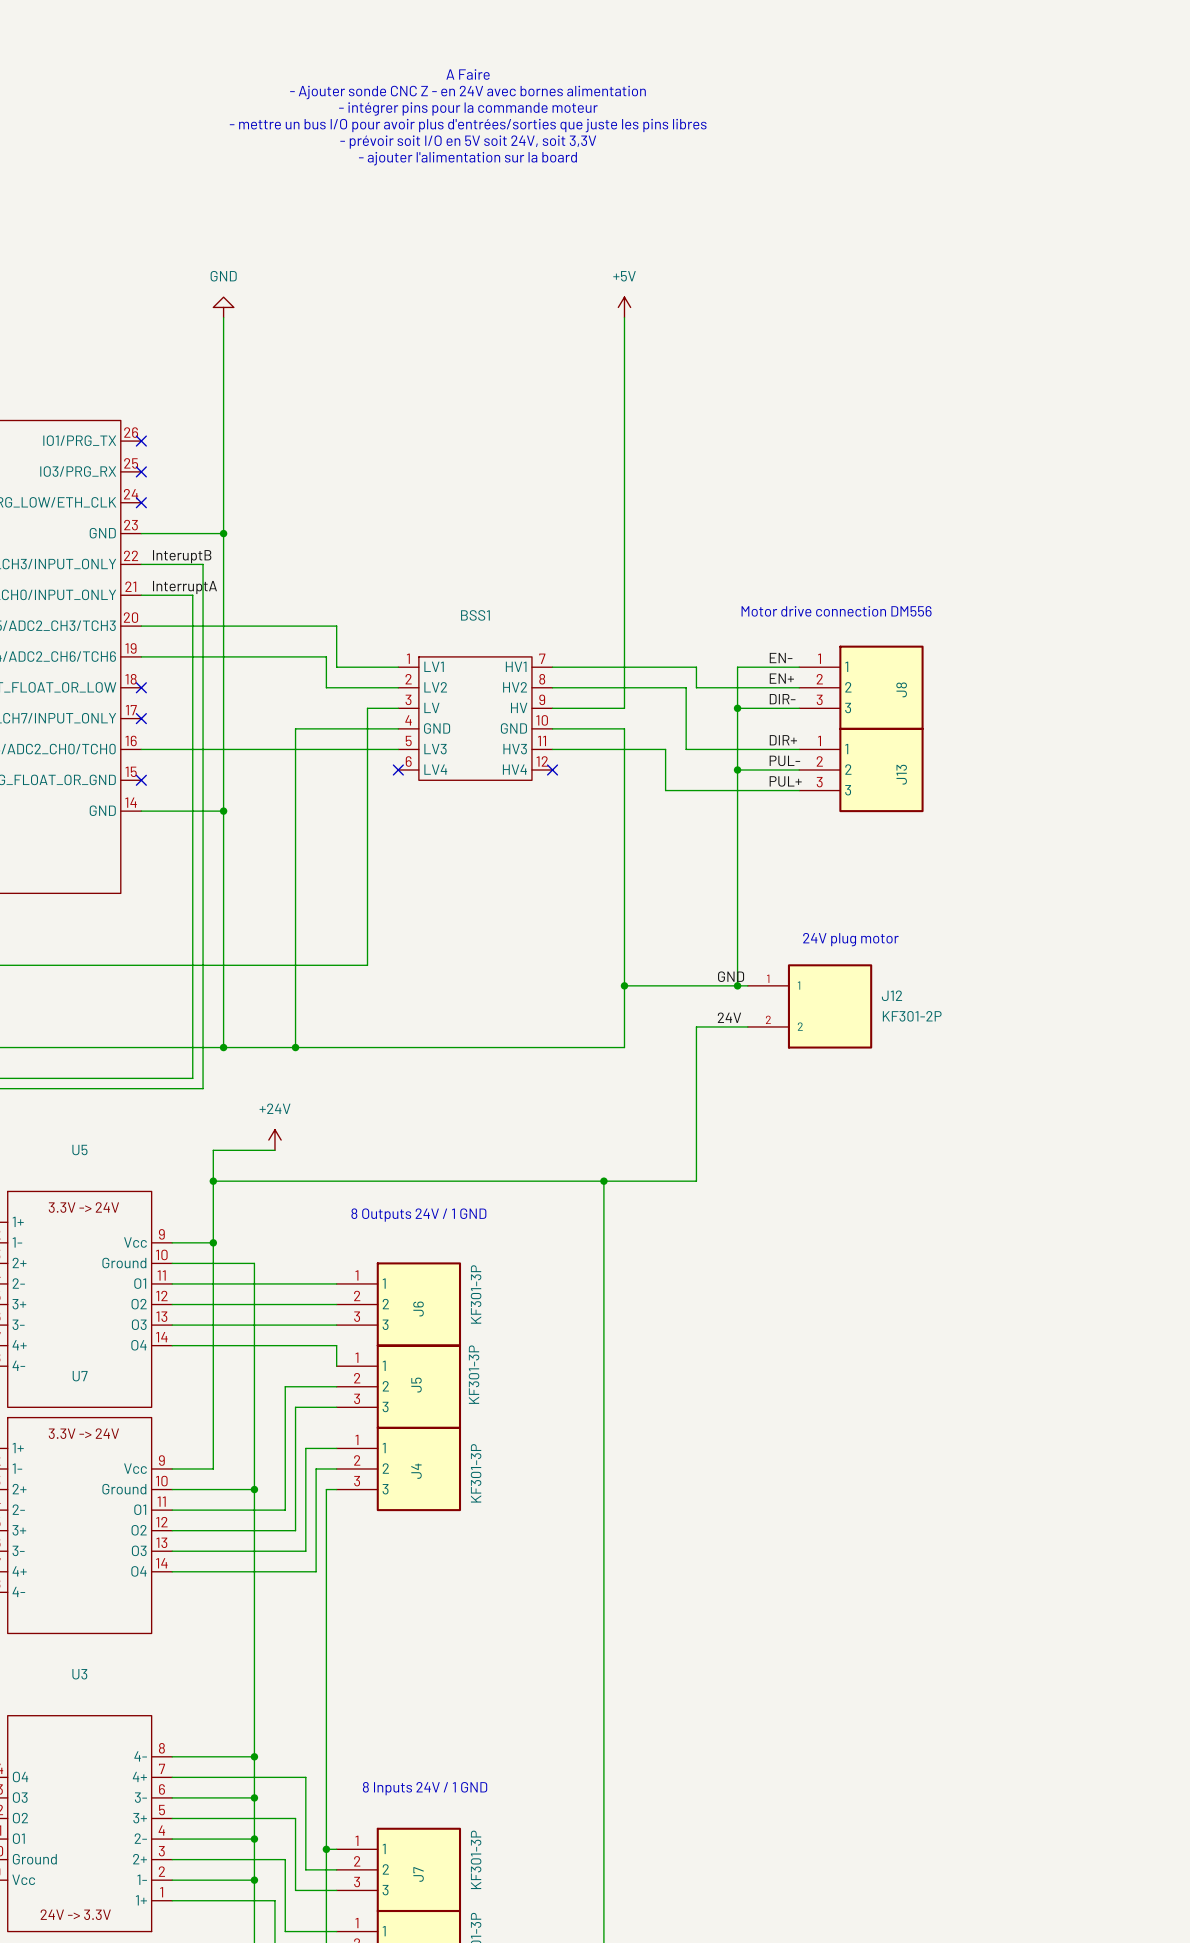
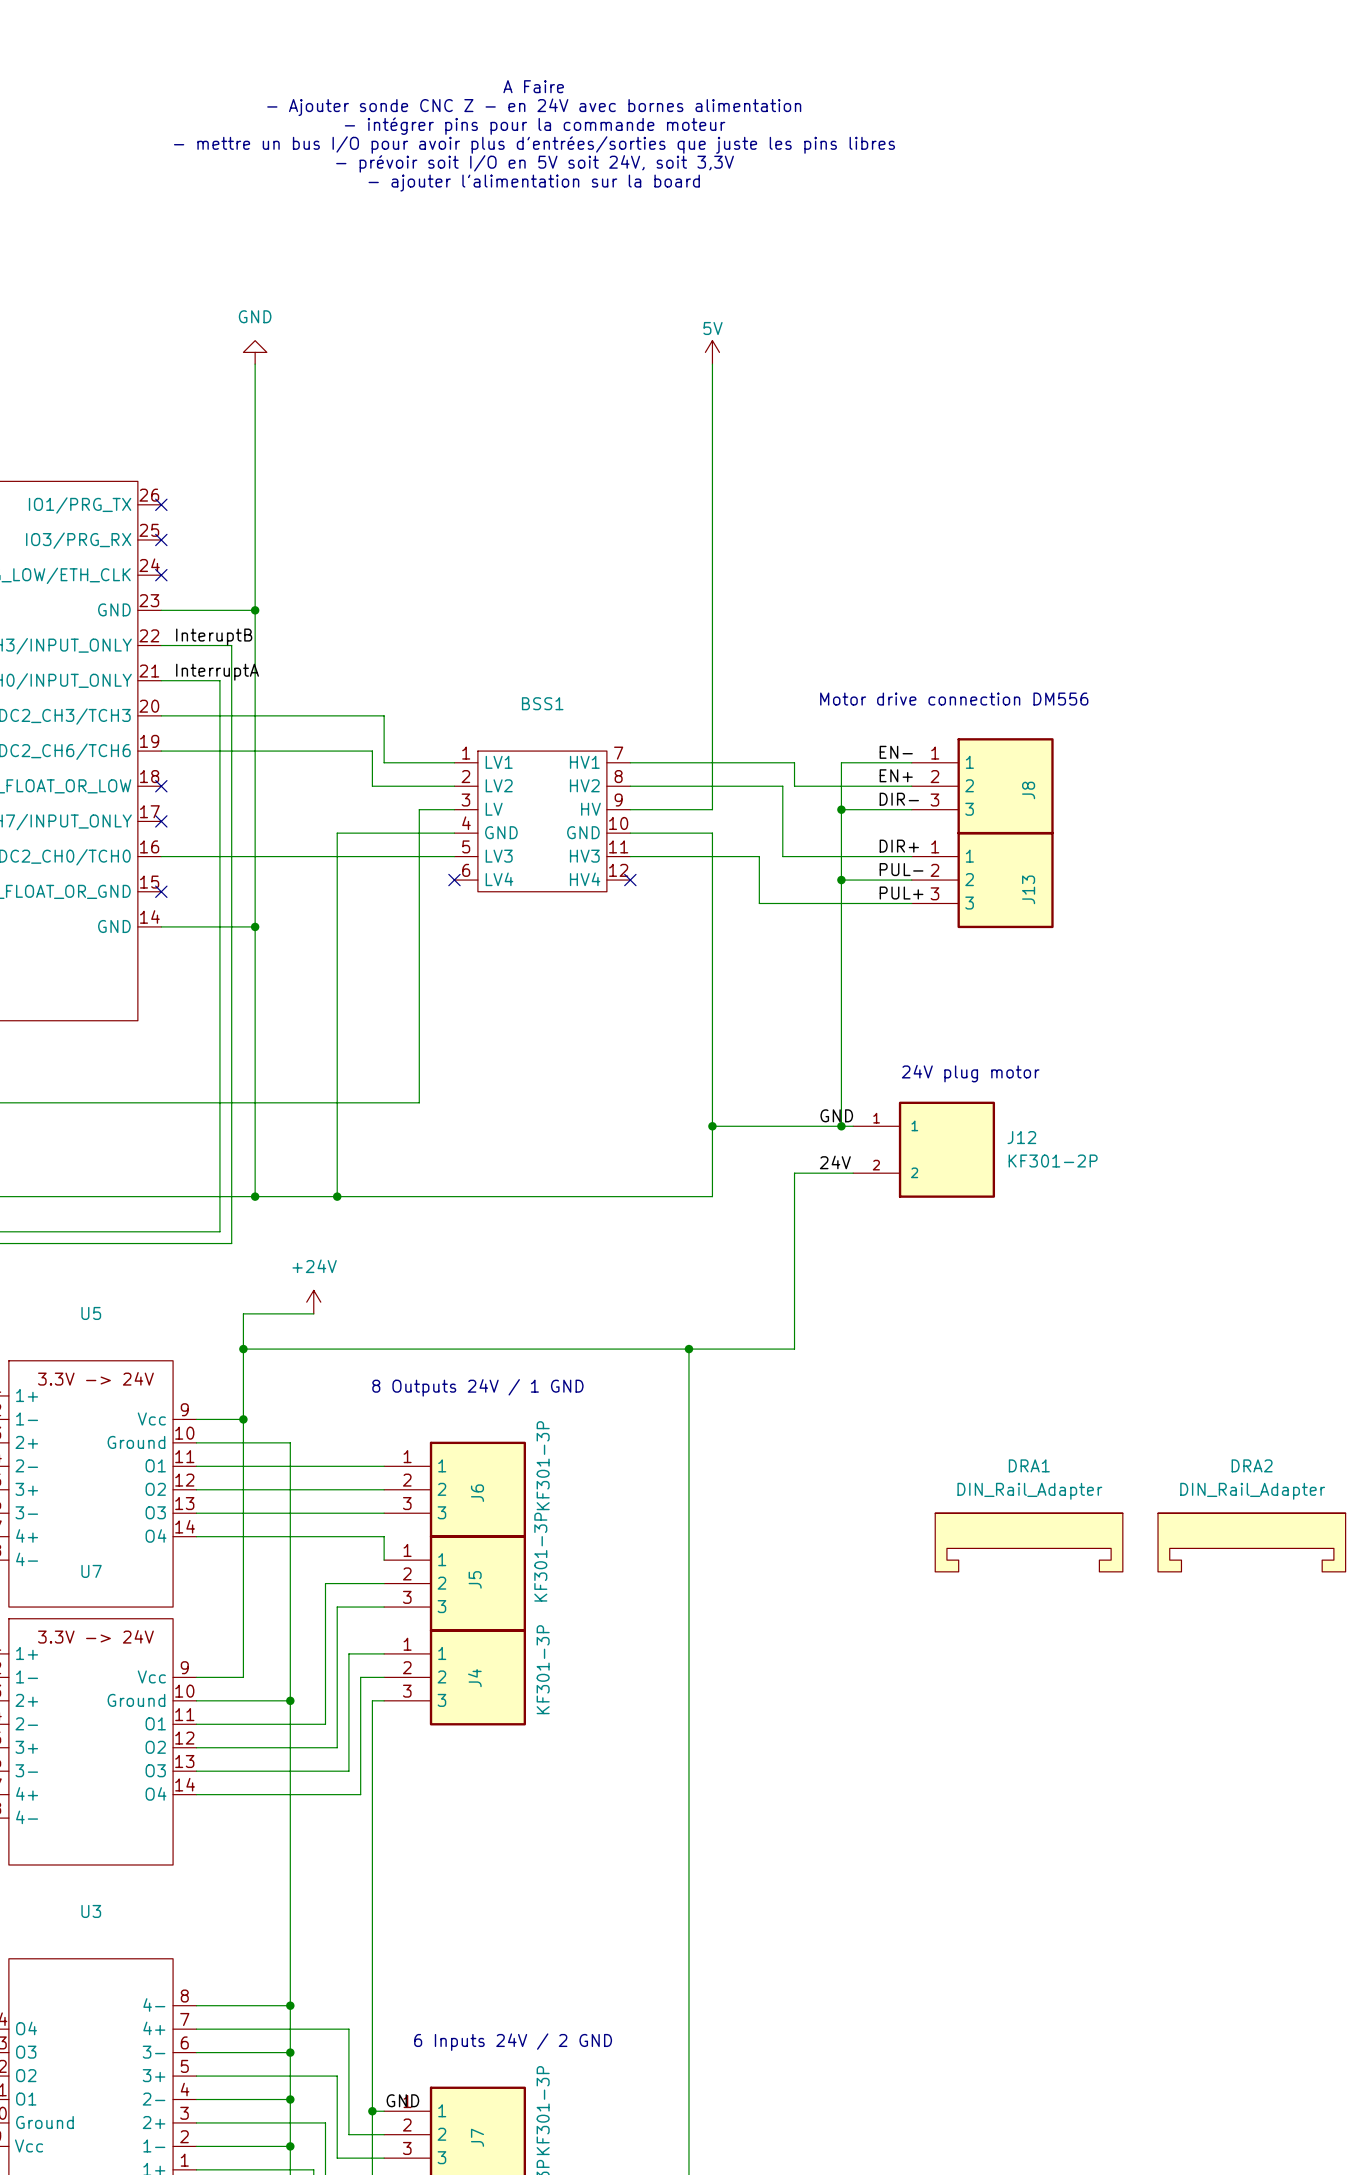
power symbol: +5V (624, 307) -> 5V (712, 352)
DRA1: none -> DIN_Rail_Adapter (1029, 1542)
DRA2: none -> DIN_Rail_Adapter (1251, 1542)
text: 8 Inputs 24V / 1 GND (425, 1788) -> 6 Inputs 24V / 2 GND (513, 2042)
label: none -> GND (402, 2100)

